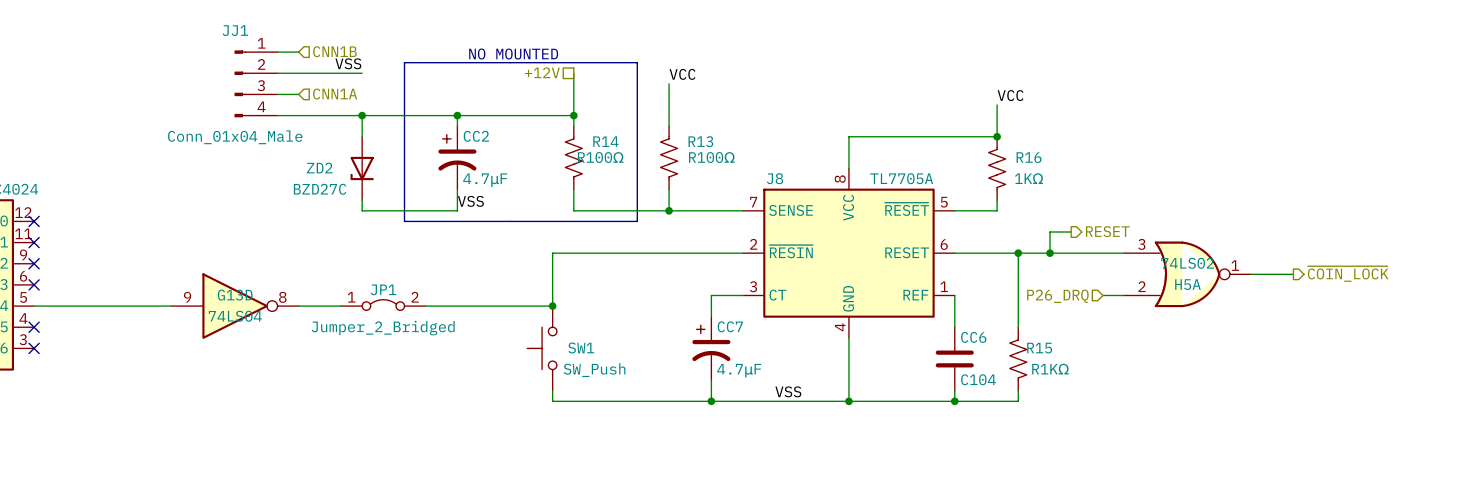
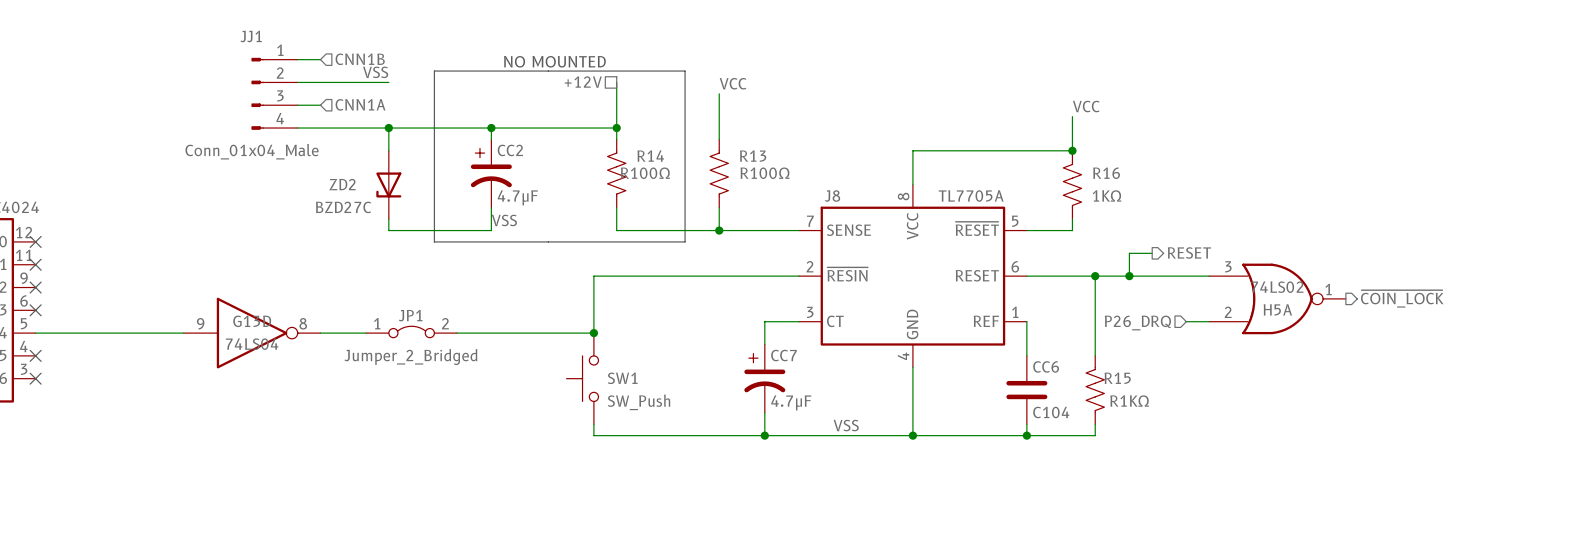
wire: (1251, 274) (1293, 274) -> none
hierarchical label position: ~{COIN_LOCK} (1348, 274) -> ~{COIN_LOCK} (1402, 298)

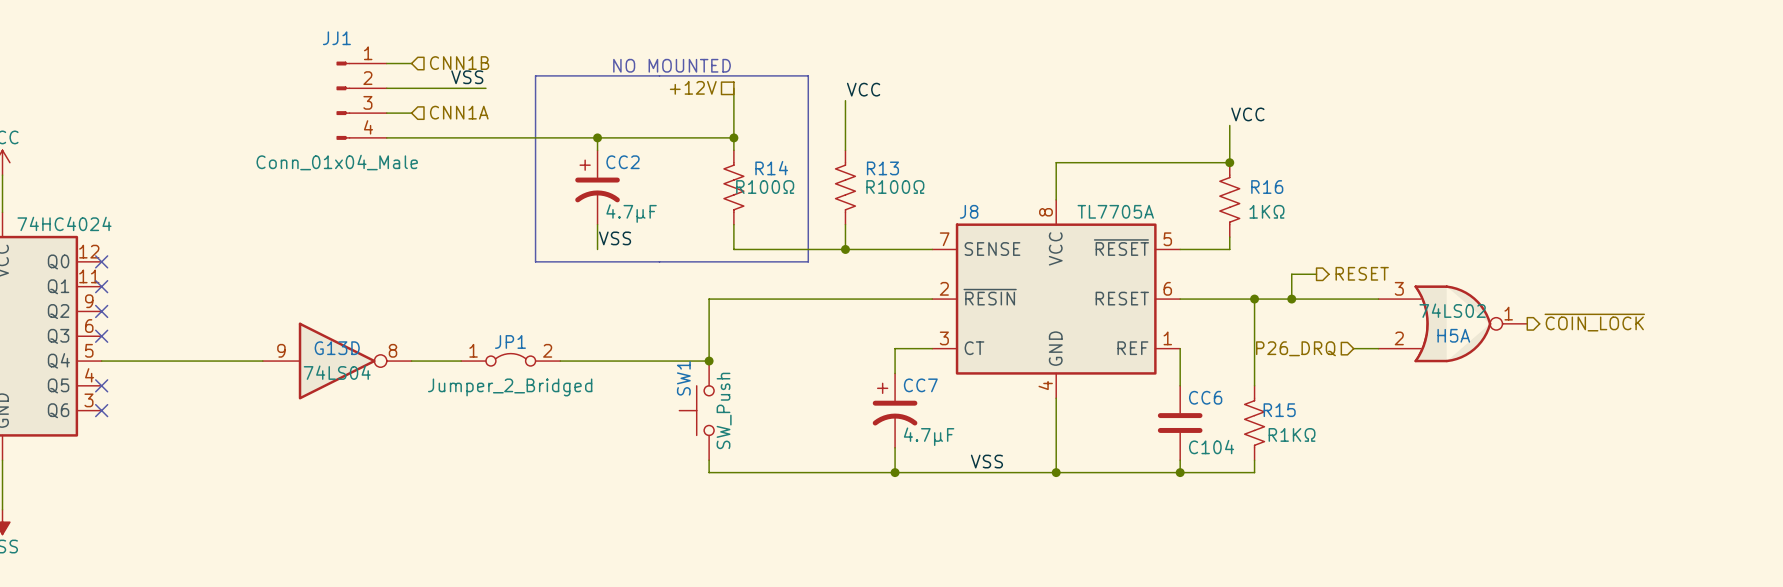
wire: (388, 128) (388, 150) -> none
junction: (388, 128) -> none
ZD2: BZD27C (388, 184) -> none
wire: (388, 219) (388, 230) (491, 230) -> none
SW1 name rotation: 0° (622, 378) -> 90° counterclockwise (683, 378)
SW1 name position: SW1 (622, 378) -> SW1 (683, 378)
SW1 value rotation: 0° (639, 402) -> 90° counterclockwise (724, 410)

